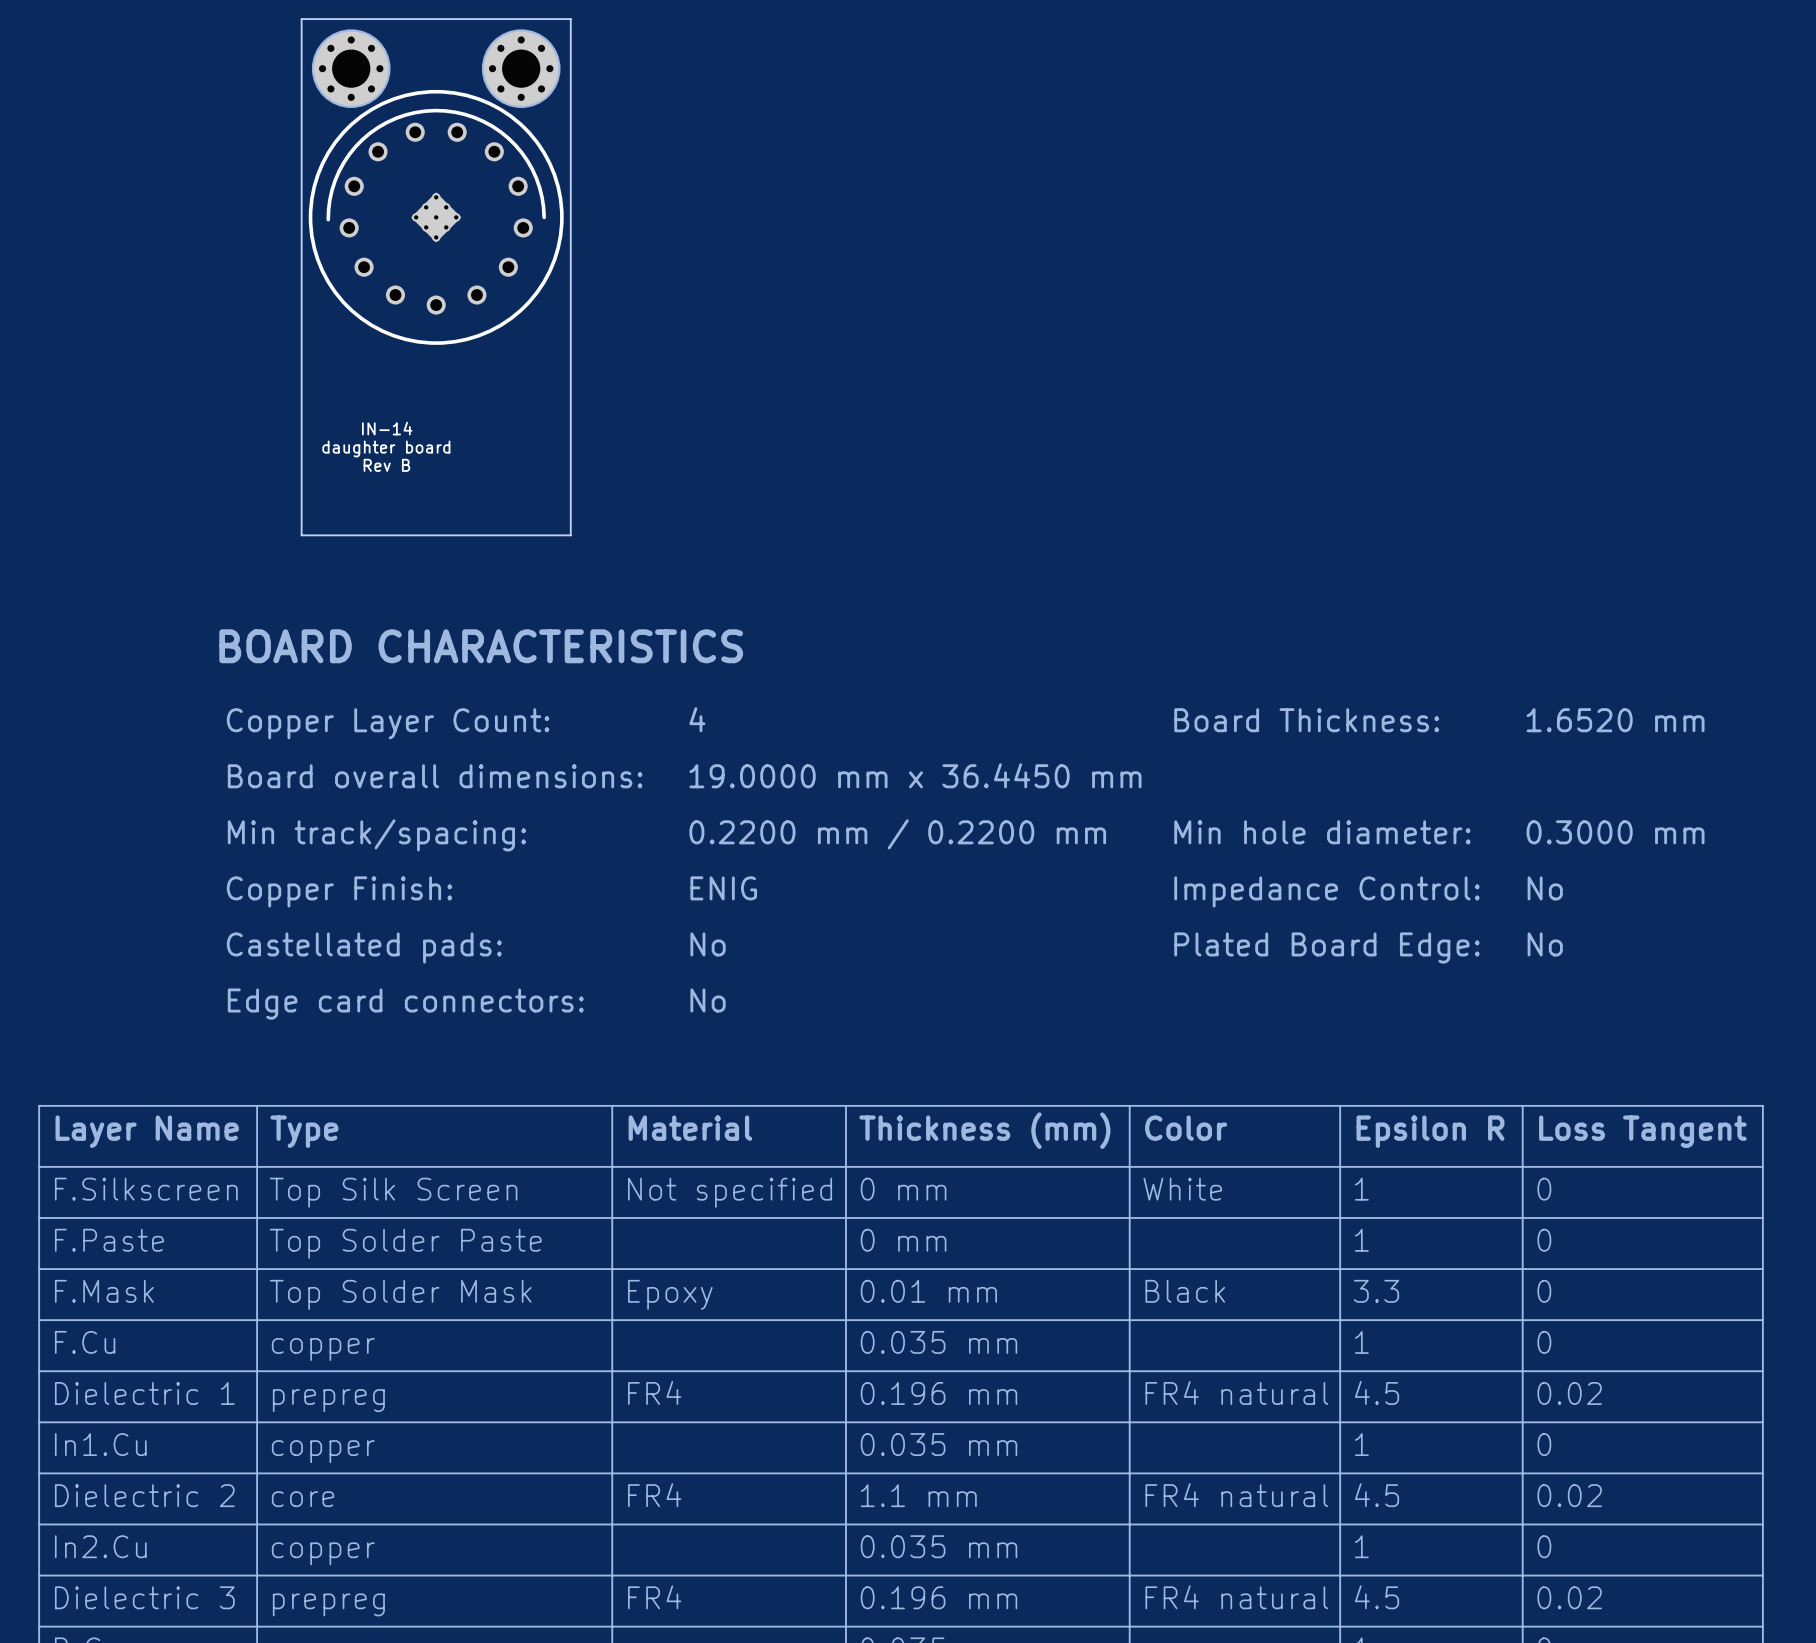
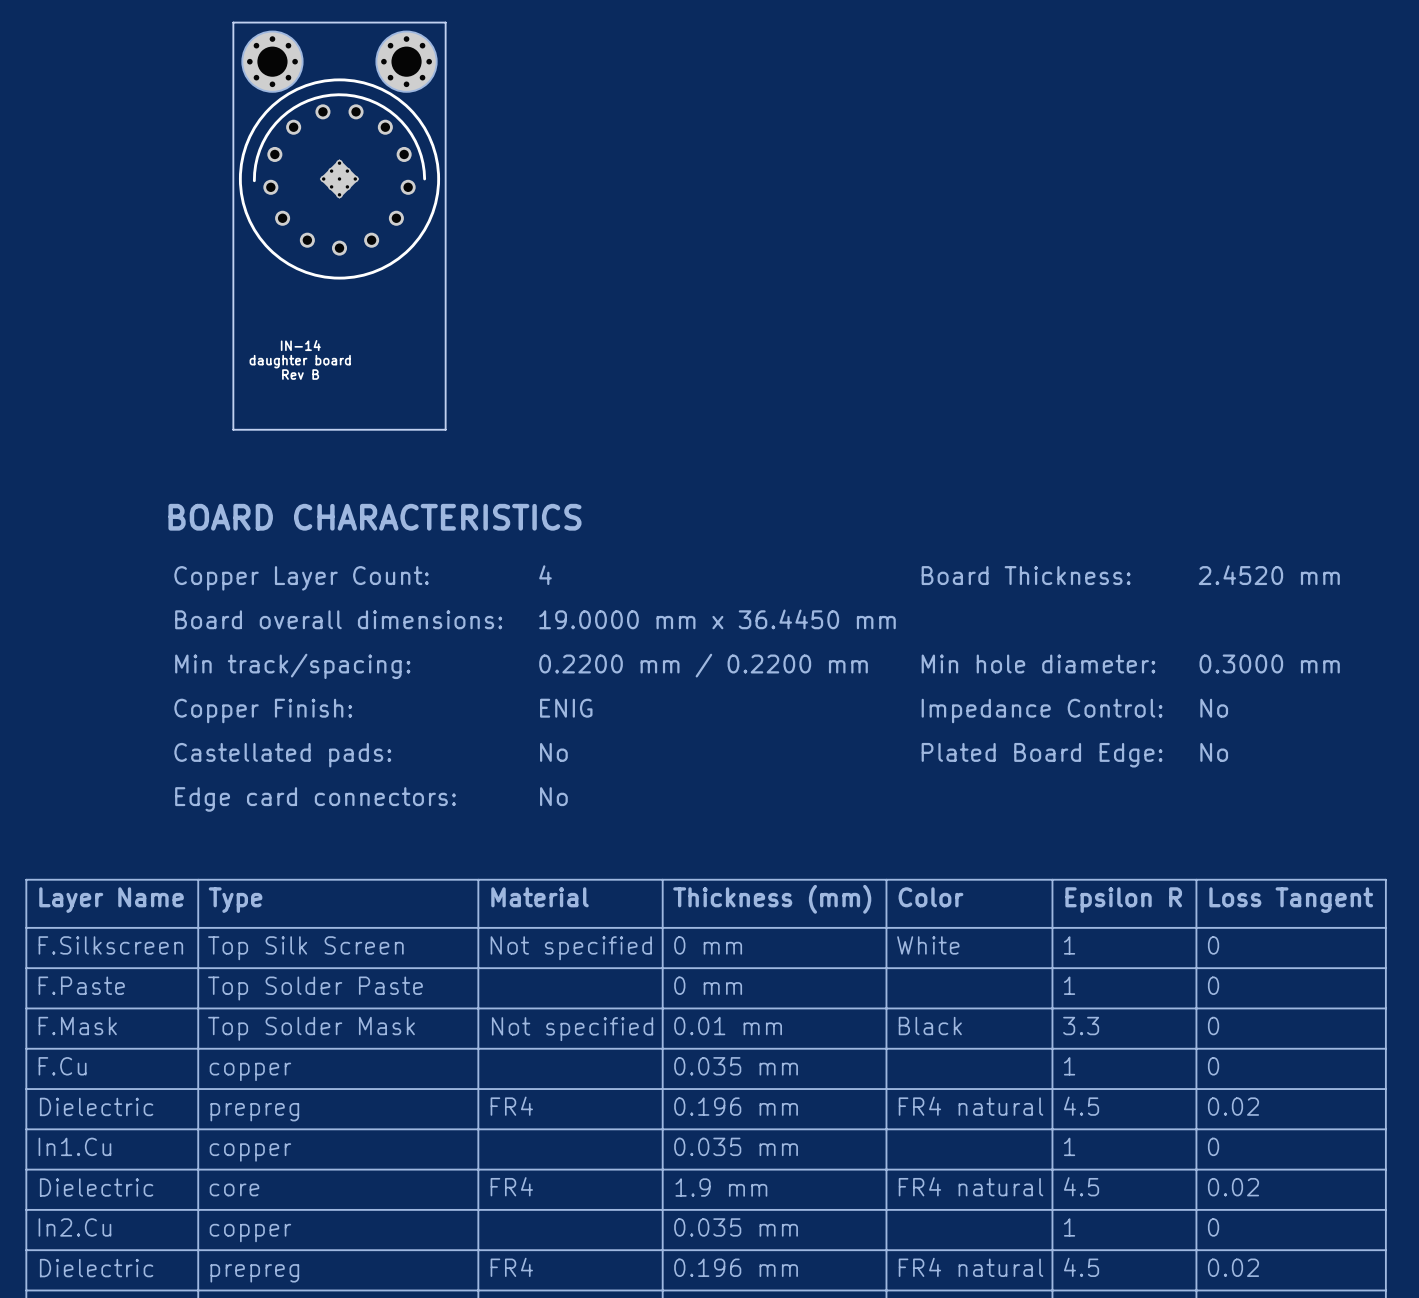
text: 1.6520 mm (1615, 720) -> 2.4520 mm (1269, 575)
text: Epoxy (670, 1294) -> Not specified (572, 1029)
text: Dielectric 1 (144, 1393) -> Dielectric (96, 1106)
text: Dielectric 2 (144, 1495) -> Dielectric (96, 1187)
text: 1.1 mm (918, 1495) -> 1.9 mm (721, 1187)
text: Dielectric 3 (144, 1597) -> Dielectric (96, 1268)

